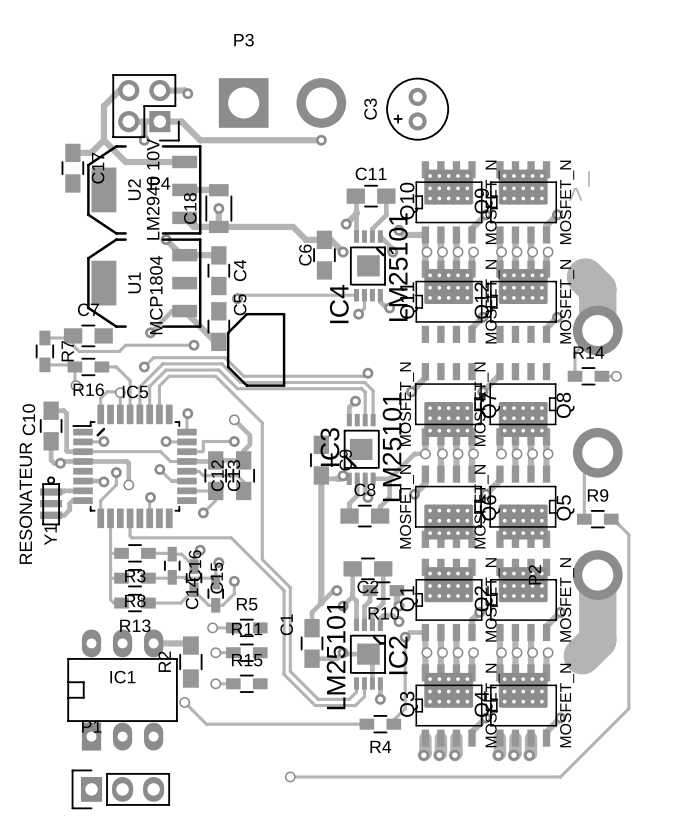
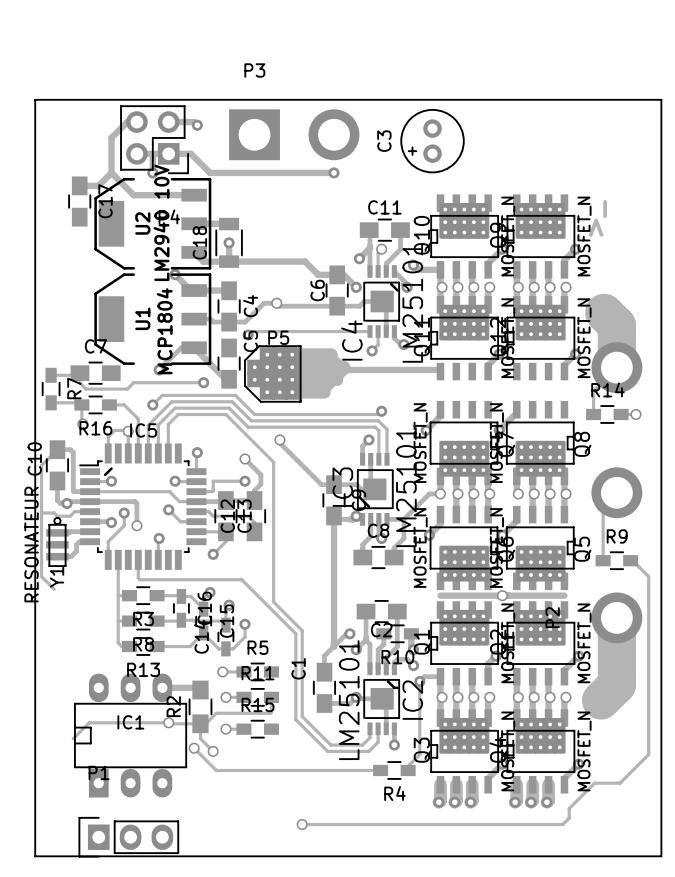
board edge: none -> (35, 99) (35, 856) (661, 856) (661, 99) (35, 99)
track: none -> (381, 249) (378, 252) (378, 271)
via: none -> (381, 249)
via: none -> (276, 303)
track: none -> (194, 319) (210, 319) (213, 322) (245, 322) (264, 303) (276, 303) (279, 306) (359, 306) (364, 301) (382, 301) (386, 305) (386, 331)
line: (246, 314) (284, 314) (284, 385) (246, 385) (228, 366) (228, 332) (246, 314) -> none
track: none -> (279, 367) (279, 379) (254, 379) (254, 367) (292, 367) (343, 367)
track: none -> (346, 369) (324, 392) (292, 392)
track: none -> (346, 369) (331, 354) (292, 354) (292, 392)
track: none -> (346, 369) (438, 369) (440, 371)
P5: none -> (272, 373)
track: none -> (292, 379) (336, 379)
track: none -> (279, 439) (279, 443) (321, 484) (356, 484) (361, 489) (374, 489) (370, 485) (370, 459)
via: none -> (279, 439)
track: none -> (57, 449) (41, 465) (41, 576) (54, 589)
track: none -> (90, 511) (74, 511) (70, 516) (41, 513)
track: none -> (440, 595) (564, 595)
via: none -> (502, 595)
track: none -> (271, 697) (270, 713) (216, 713) (205, 723) (89, 722) (73, 738)
via: none -> (168, 722)
track: none -> (200, 723) (200, 738) (213, 751)
via: none -> (213, 751)
track: (600, 736) (560, 776) (544, 776) -> (620, 783) (594, 783) (569, 808) (569, 818) (562, 824)

